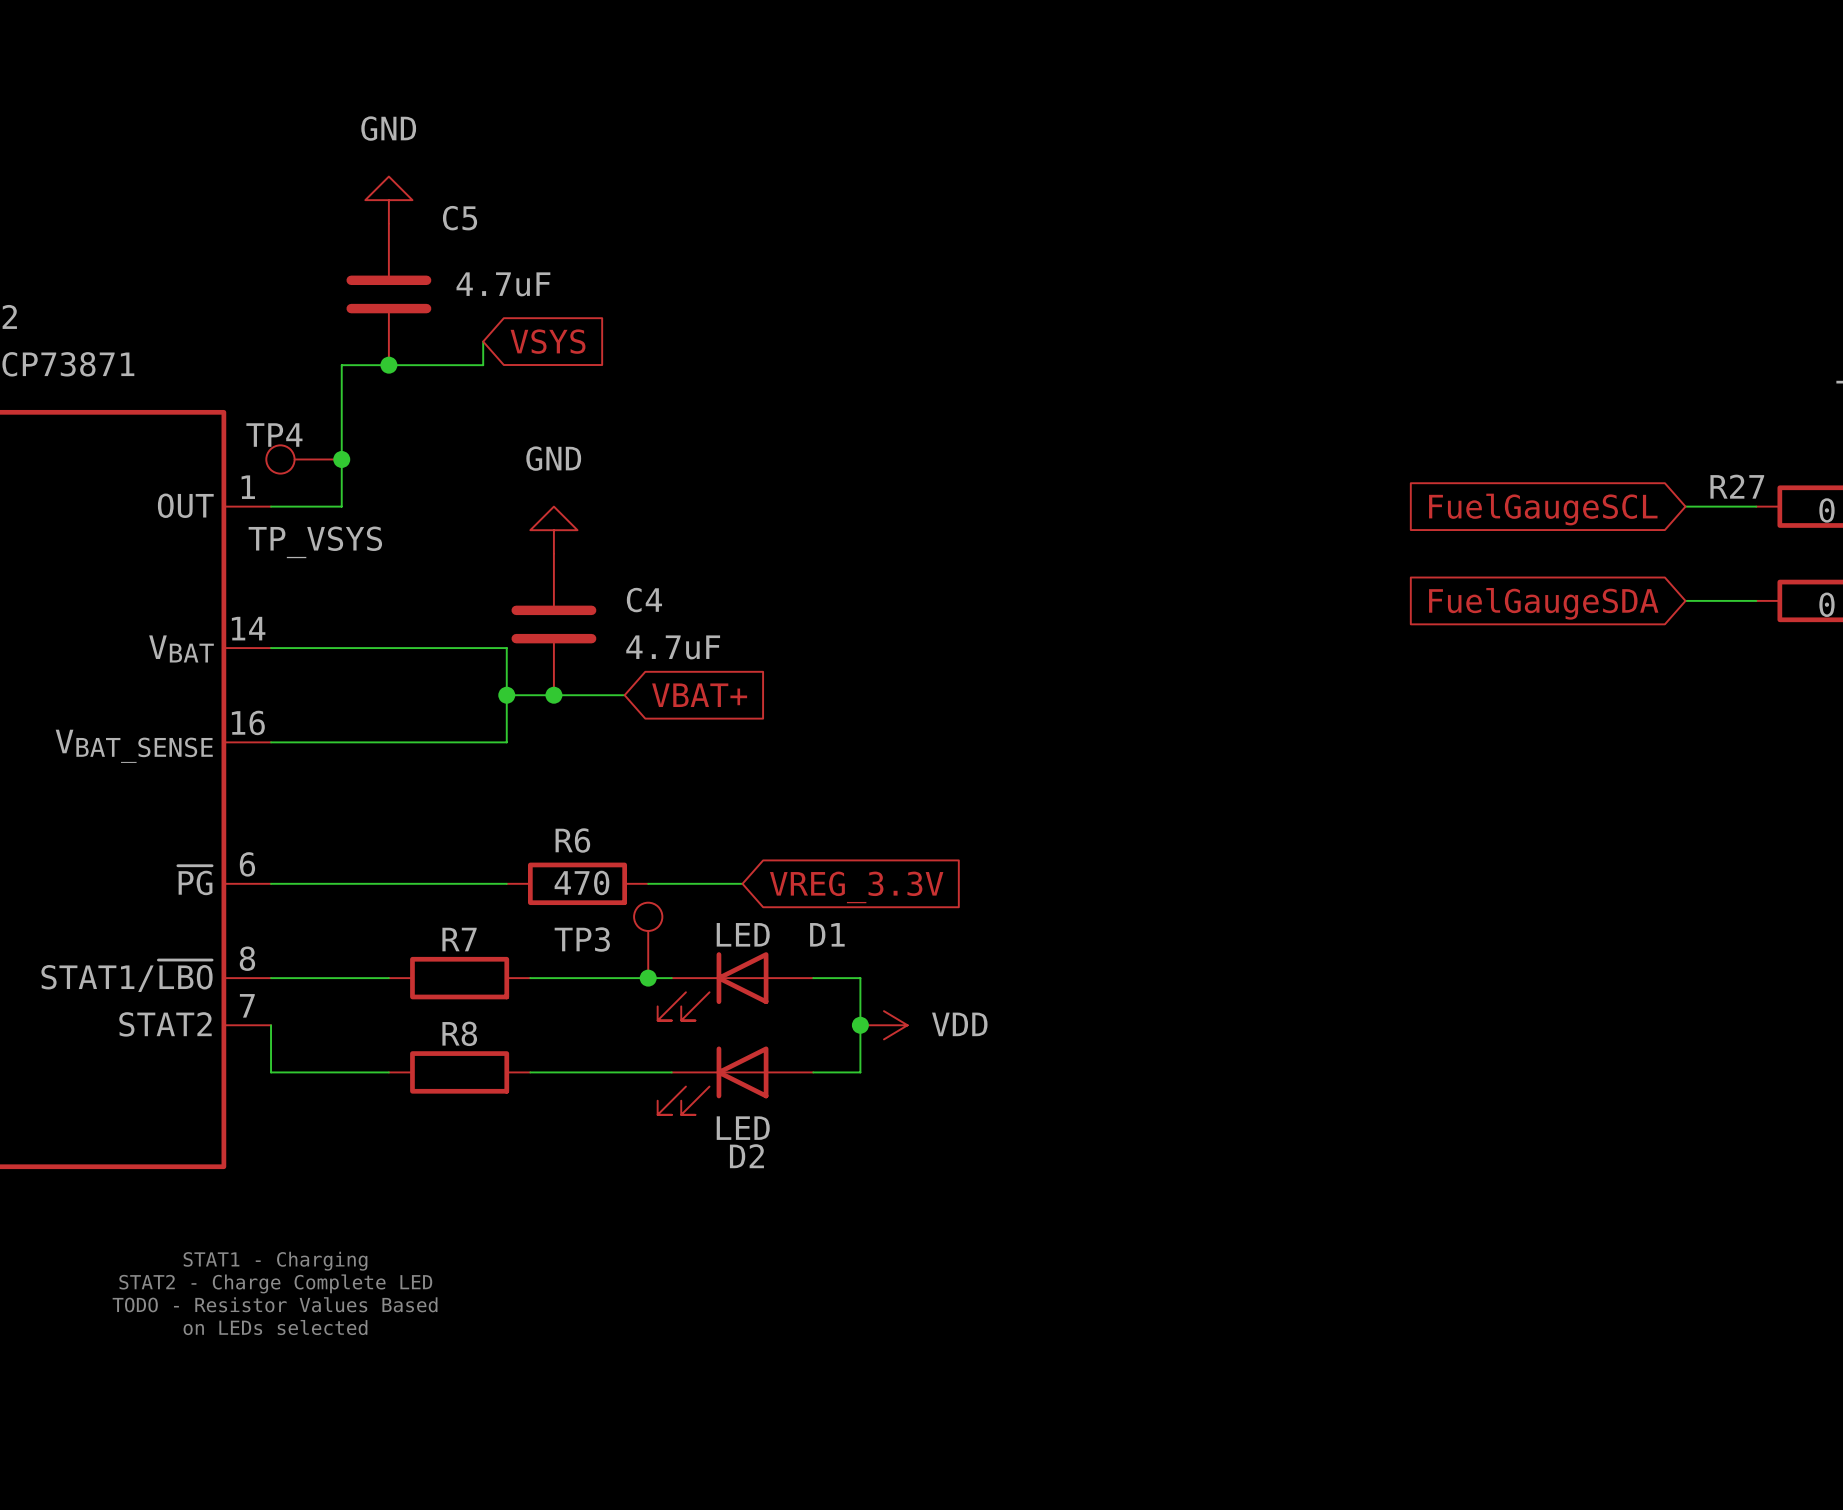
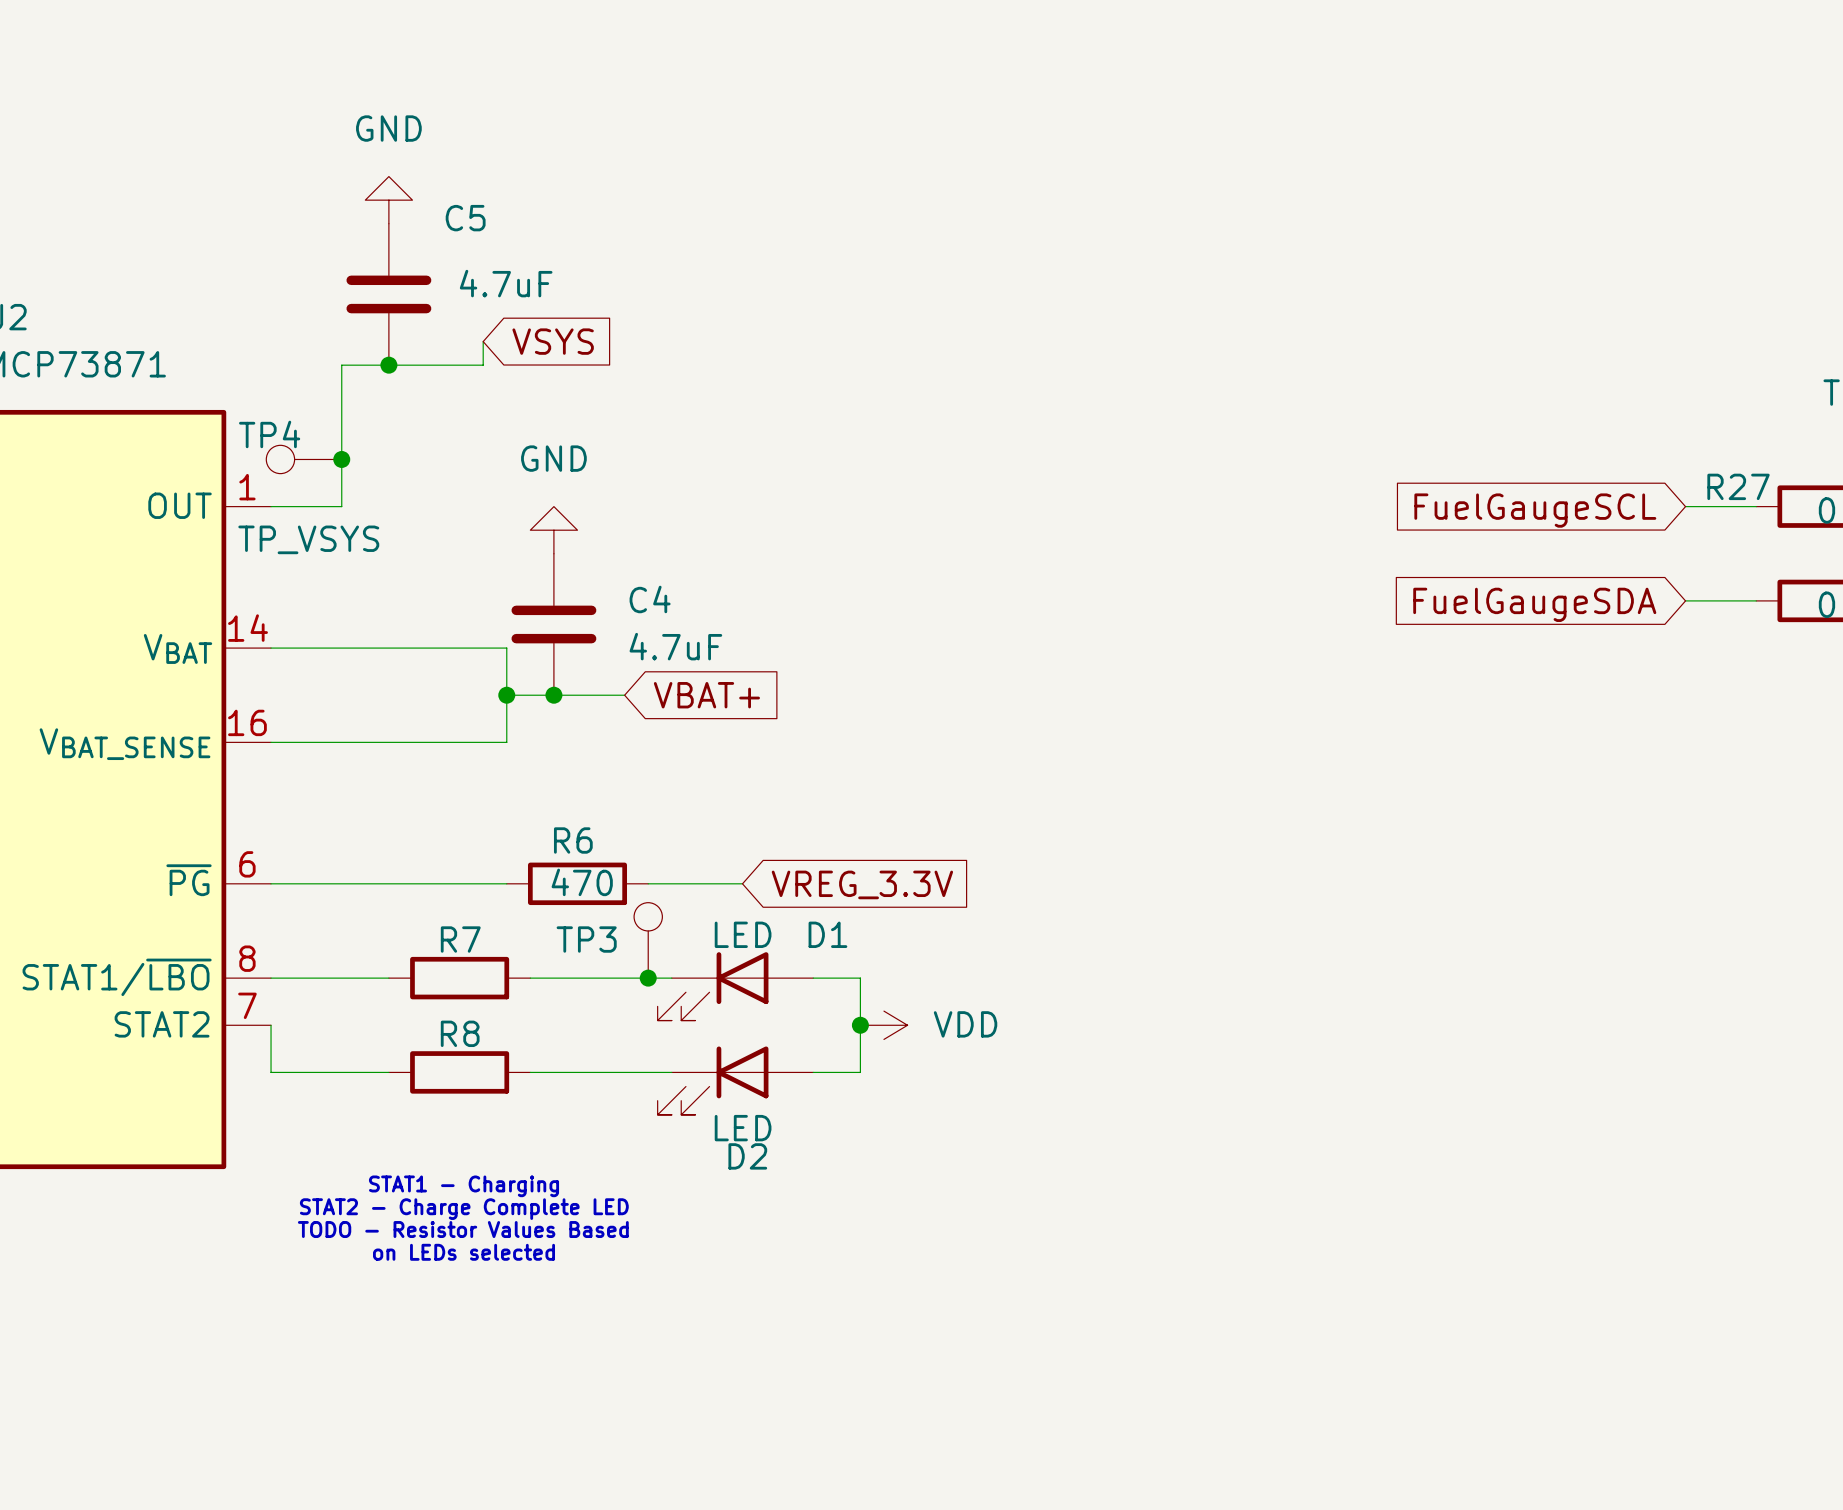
text position: STAT1 - Charging (275, 1261) -> STAT1 - Charging (464, 1186)
text position: STAT2 - Charge Complete LED (275, 1283) -> STAT2 - Charge Complete LED (464, 1209)
text position: TODO - Resistor Values Based (275, 1304) -> TODO - Resistor Values Based (463, 1229)
text position: on LEDs selected (275, 1327) -> on LEDs selected (464, 1252)

